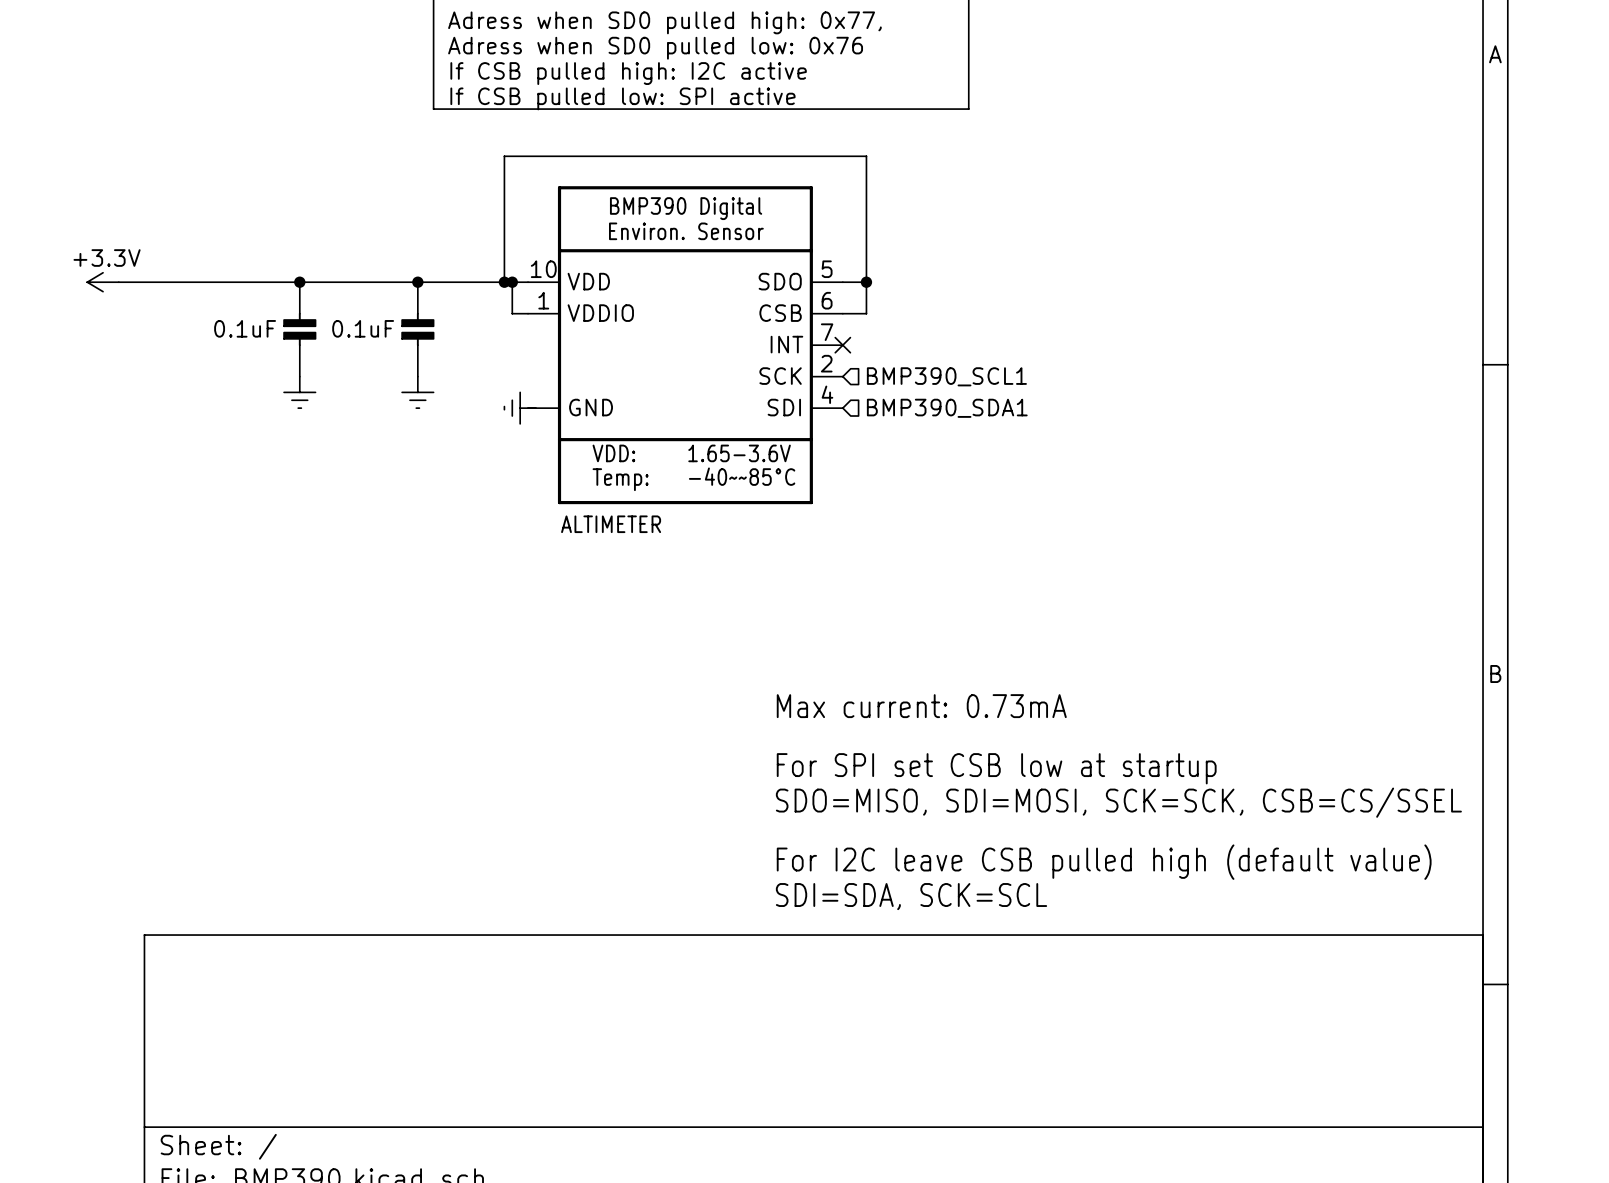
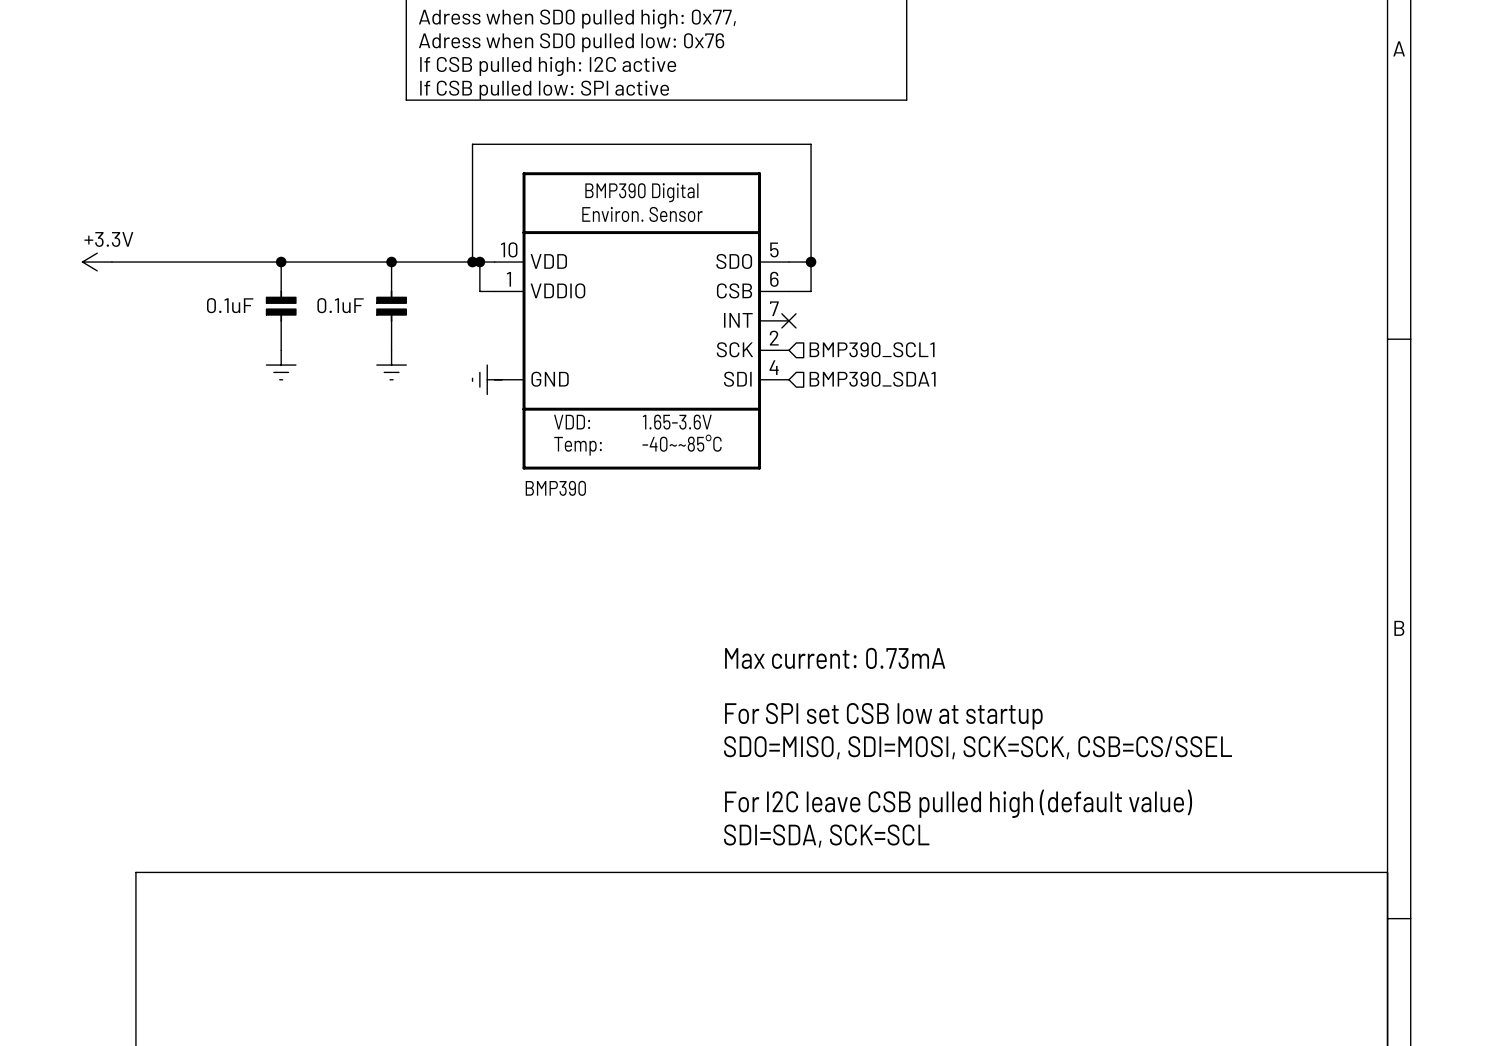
part value: ALTIMETER (611, 524) -> BMP390 (555, 488)

